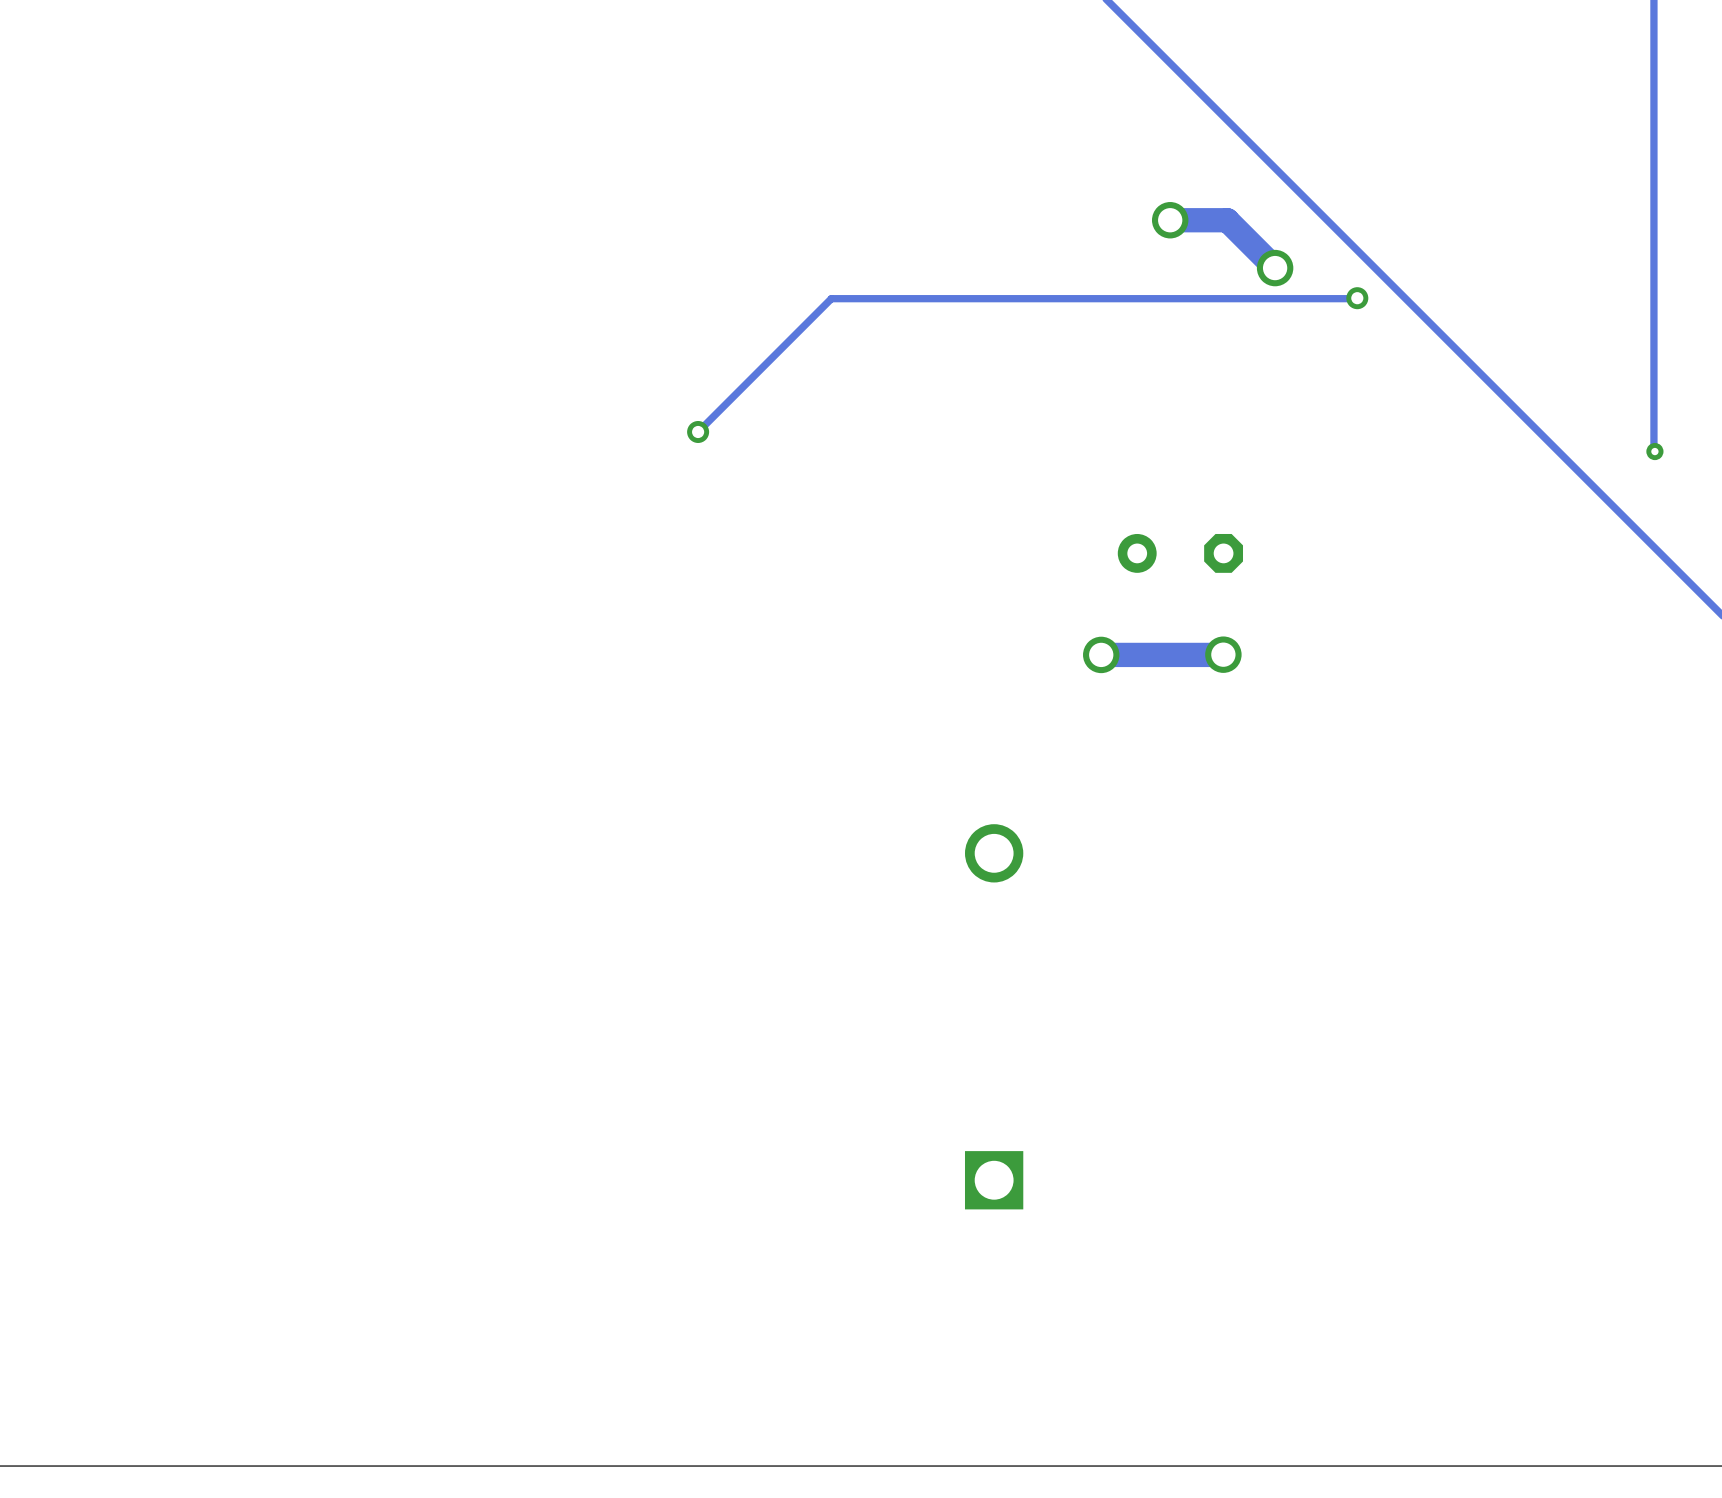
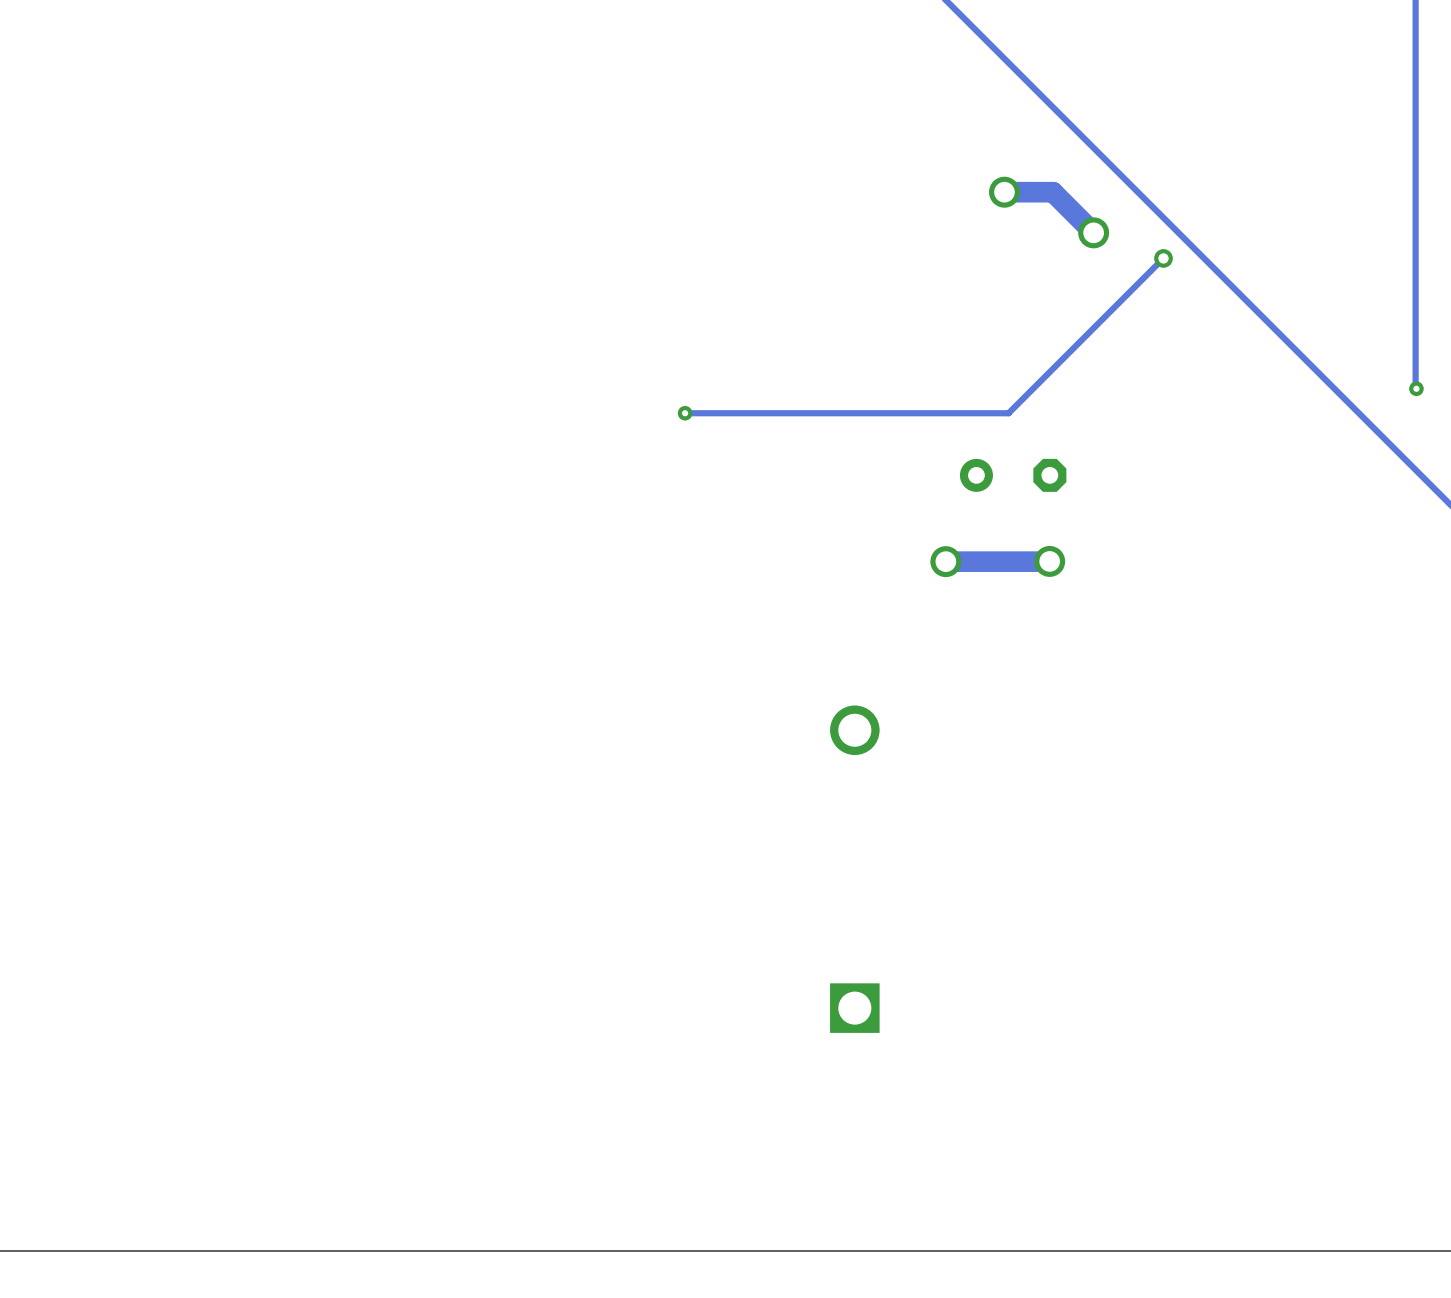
track: (1356, 298) (831, 298) (698, 431) -> (1162, 258) (1008, 413) (685, 413)
via: (698, 431) -> none
via: none -> (685, 413)

